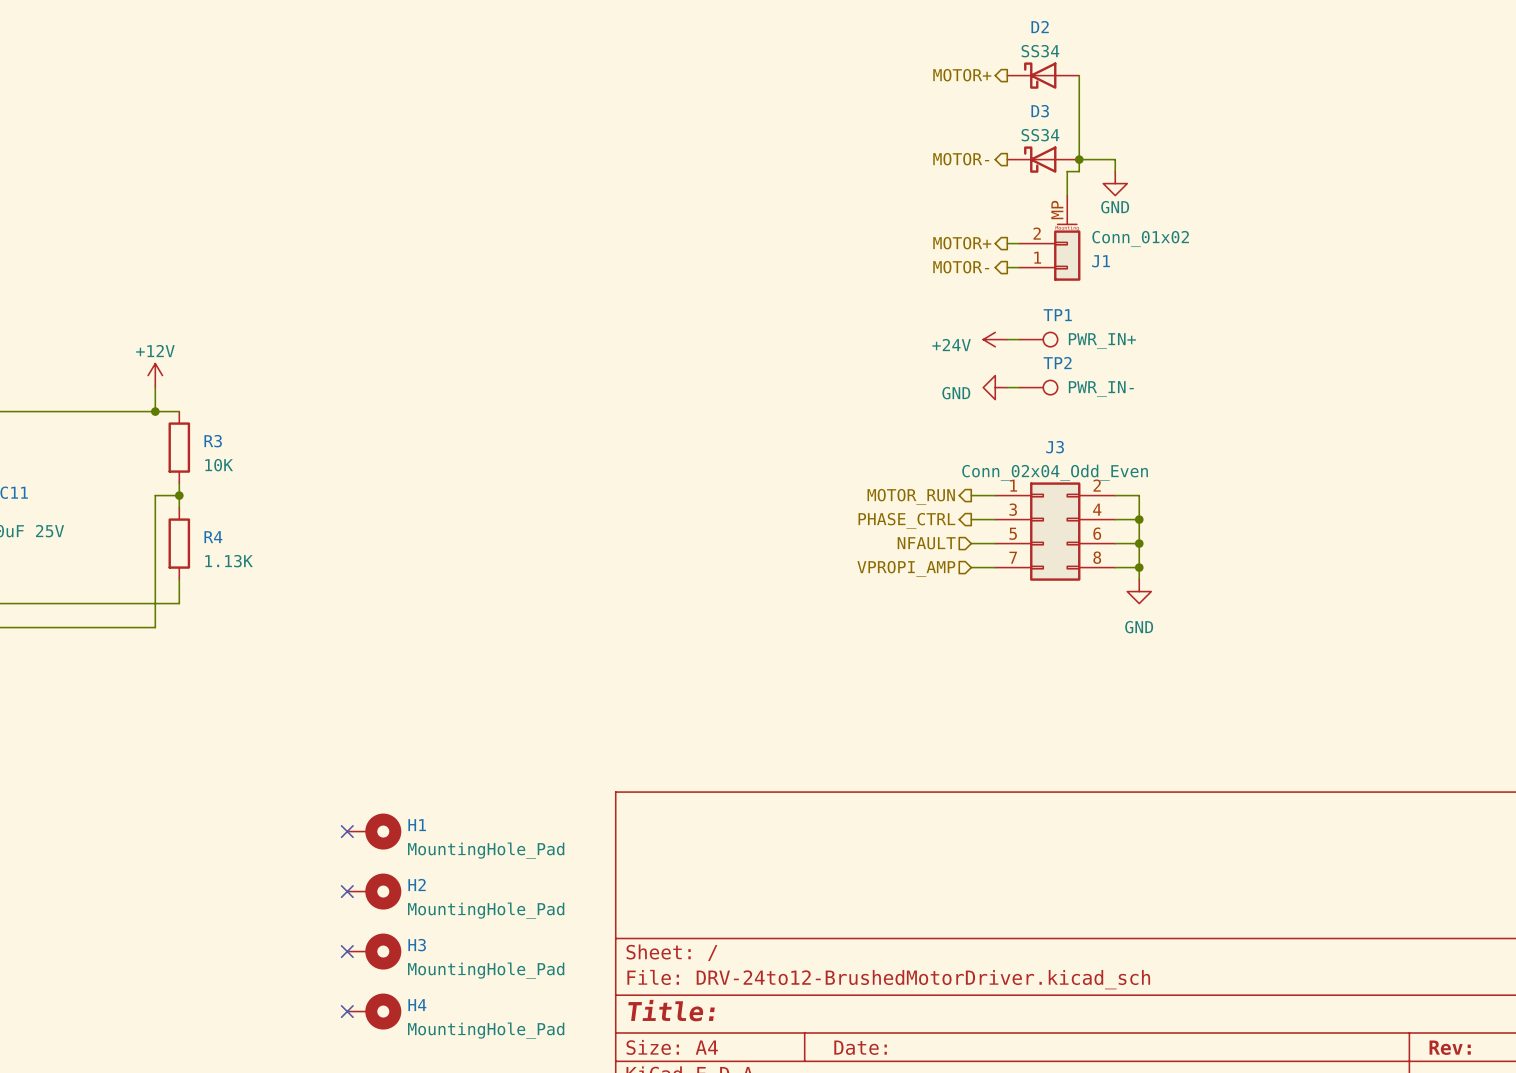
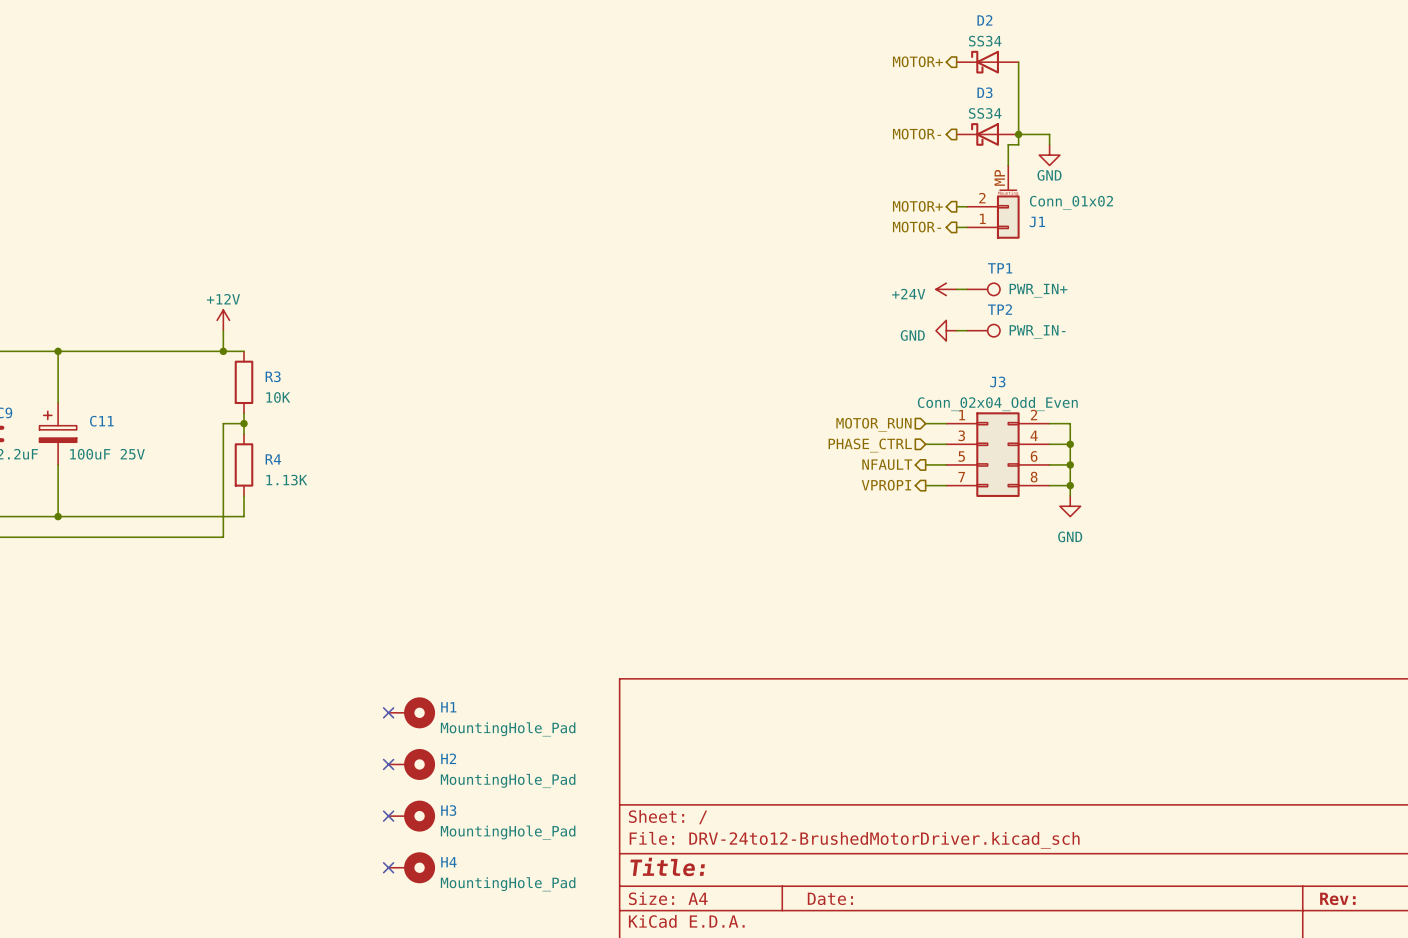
hierarchical label shape: output (911, 496) -> input (873, 424)
hierarchical label shape: output (906, 520) -> input (870, 445)
hierarchical label shape: input (926, 543) -> output (887, 464)
hierarchical label shape: input (906, 568) -> output (886, 485)
hierarchical label: VPROPI_AMP (906, 568) -> VPROPI (886, 485)

